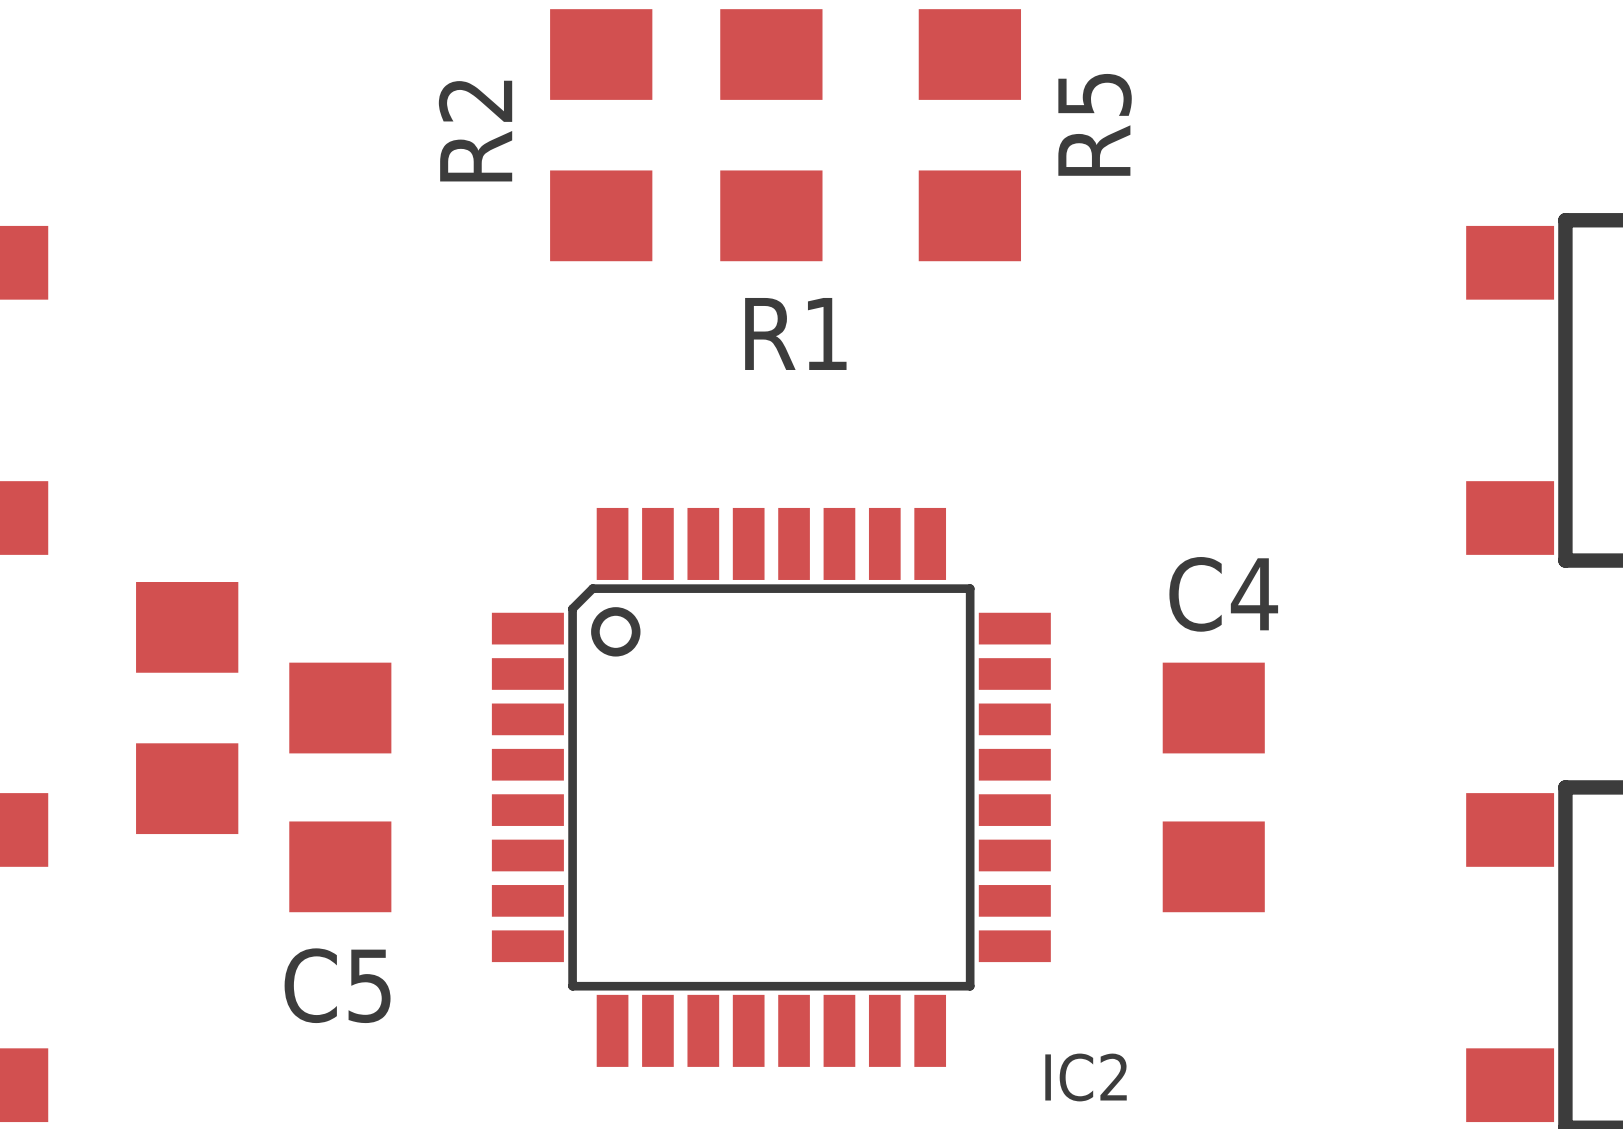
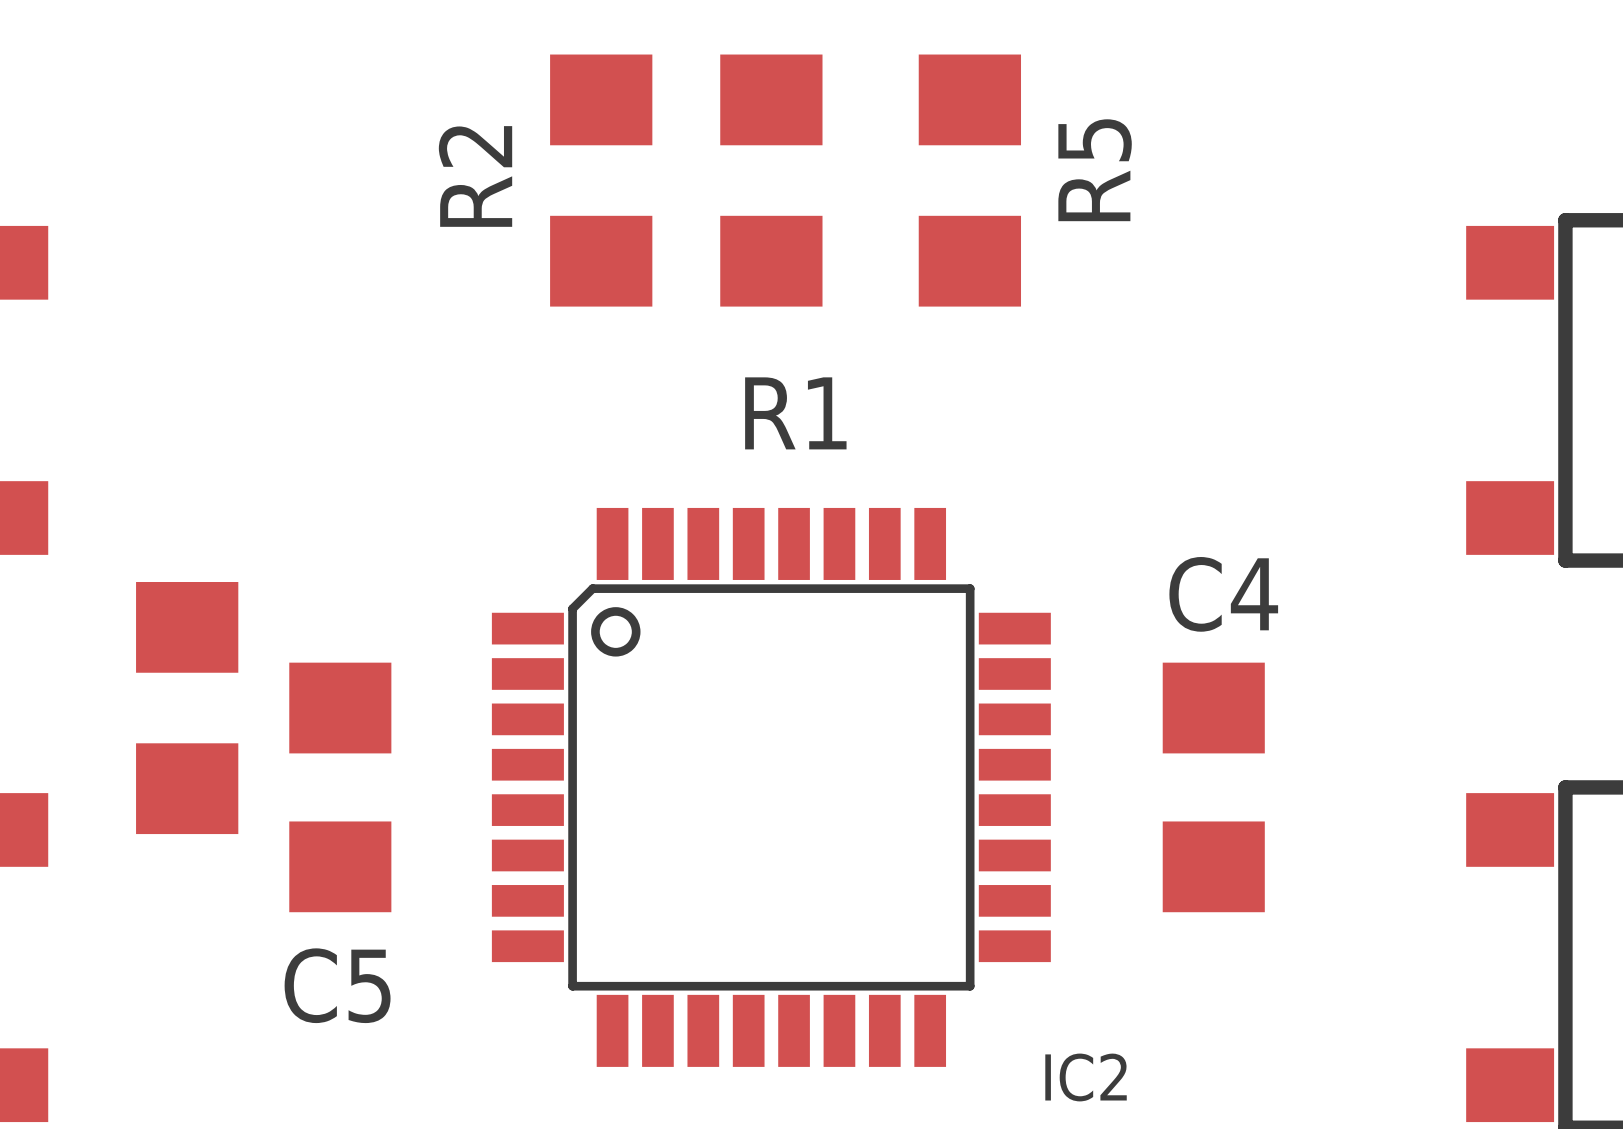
R2 position: (601, 135) -> (601, 180)
R1 position: (771, 135) -> (771, 180)
R5 position: (969, 135) -> (969, 180)
R1 name position: R1 (795, 333) -> R1 (795, 413)

